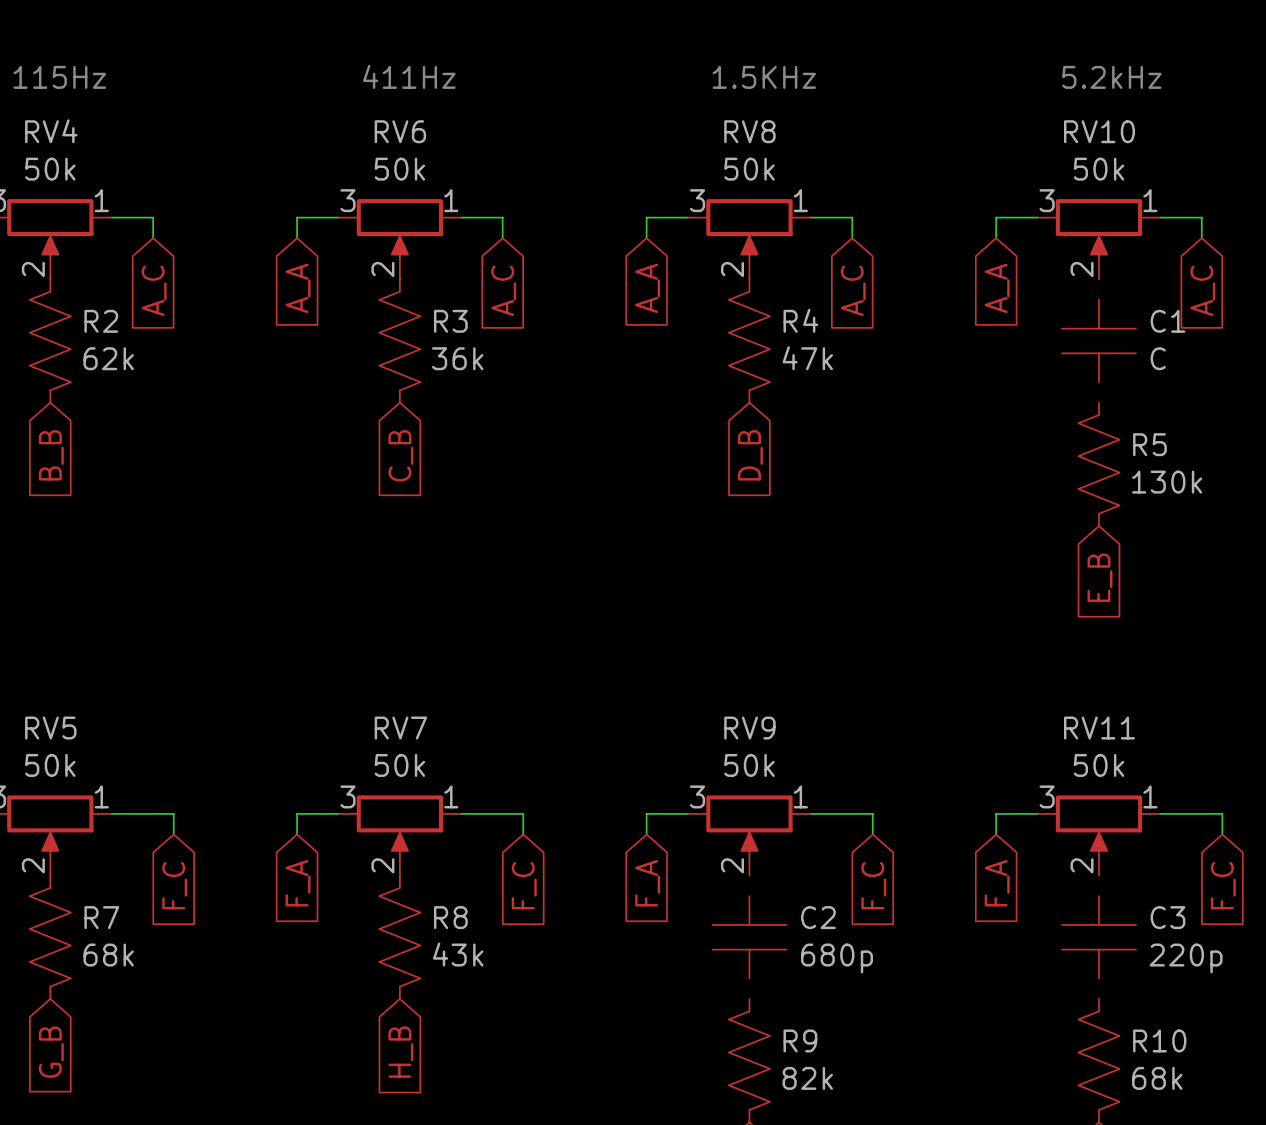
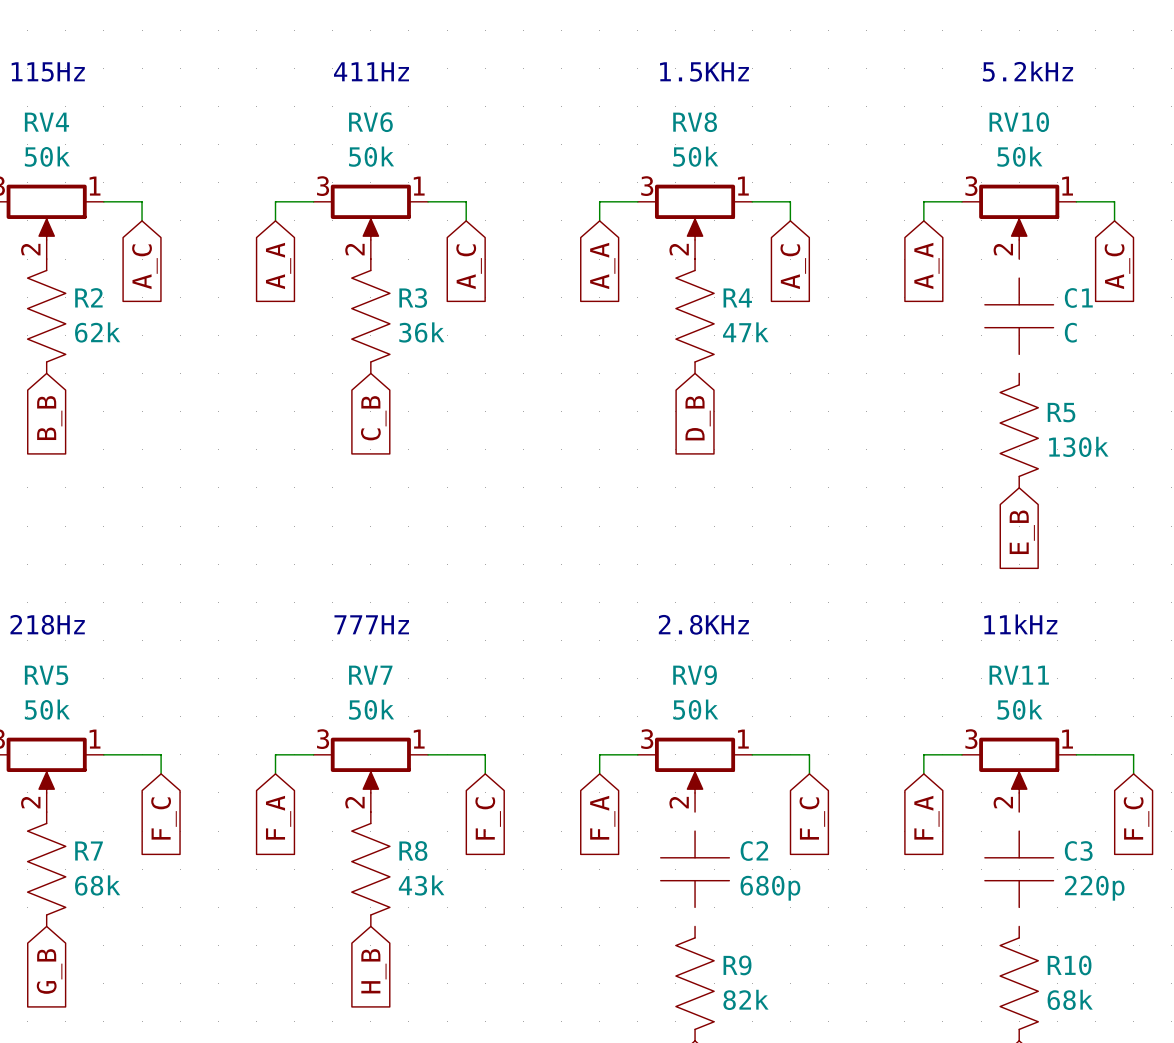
text: none -> 218Hz (47, 624)
text: none -> 777Hz (371, 624)
text: none -> 2.8KHz (703, 624)
text: none -> 11kHz (1020, 624)

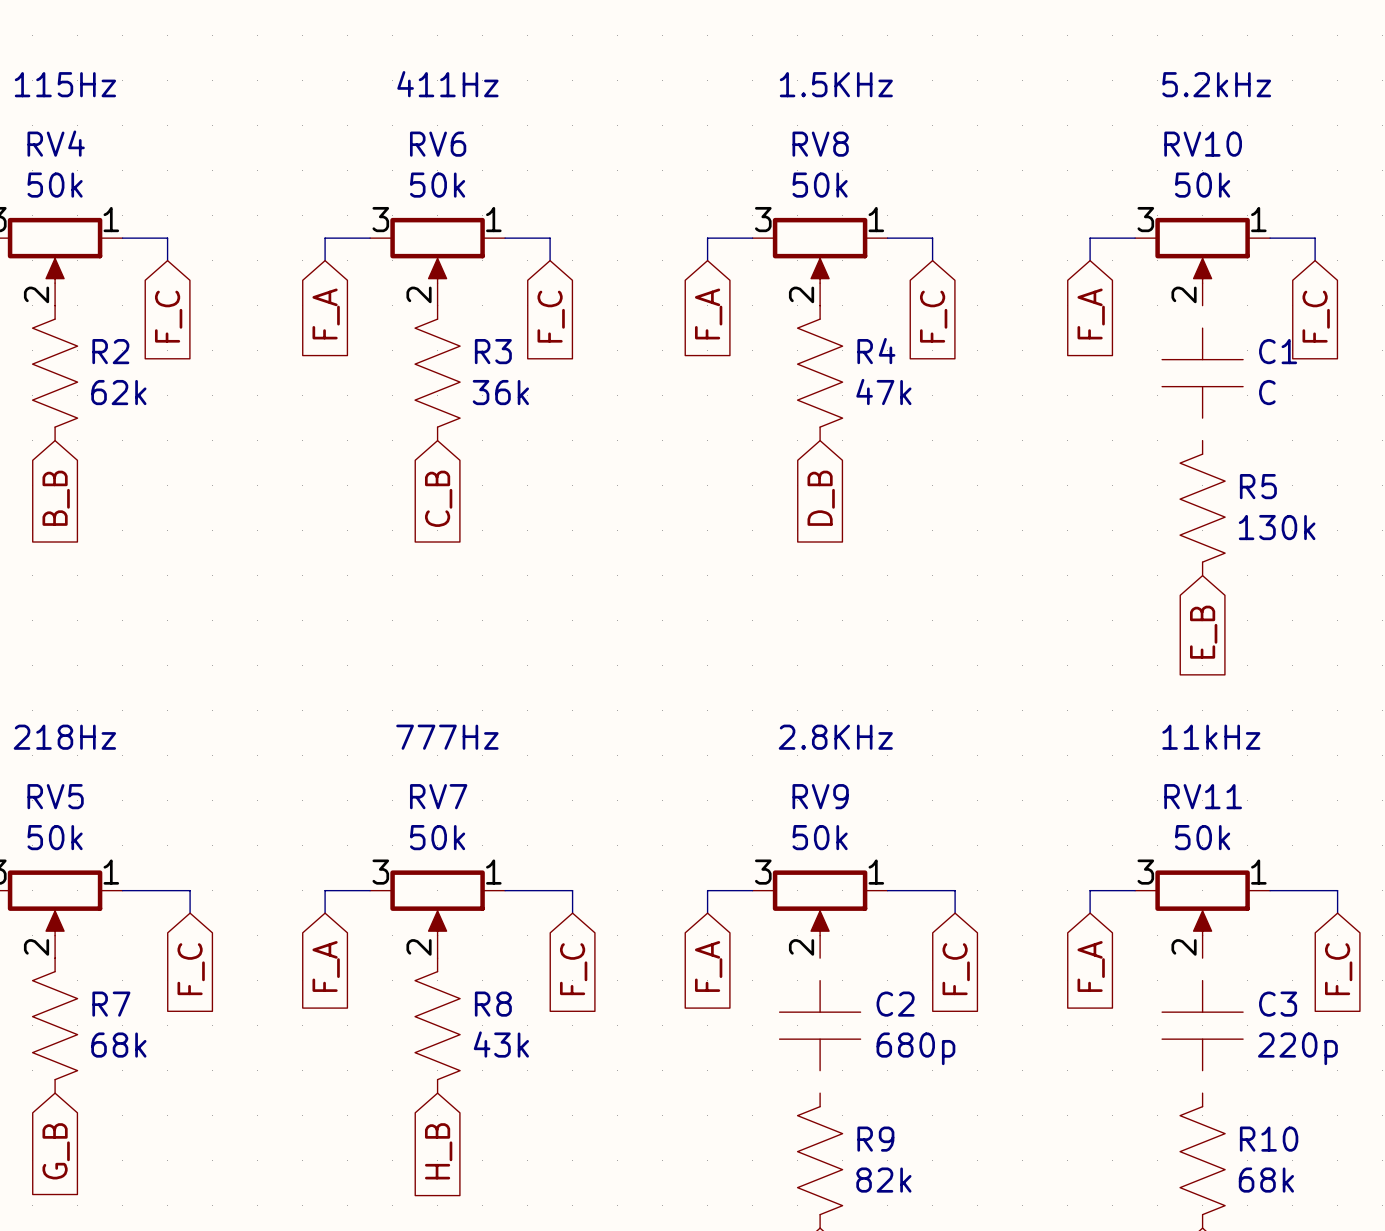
global label: A_A (278, 265) -> F_A (326, 313)
global label: A_A (602, 265) -> F_A (708, 313)
global label: A_A (926, 265) -> F_A (1091, 313)
global label: A_C (144, 266) -> F_C (168, 316)
global label: A_C (469, 266) -> F_C (551, 316)
global label: A_C (793, 266) -> F_C (933, 316)
global label: A_C (1117, 266) -> F_C (1316, 316)

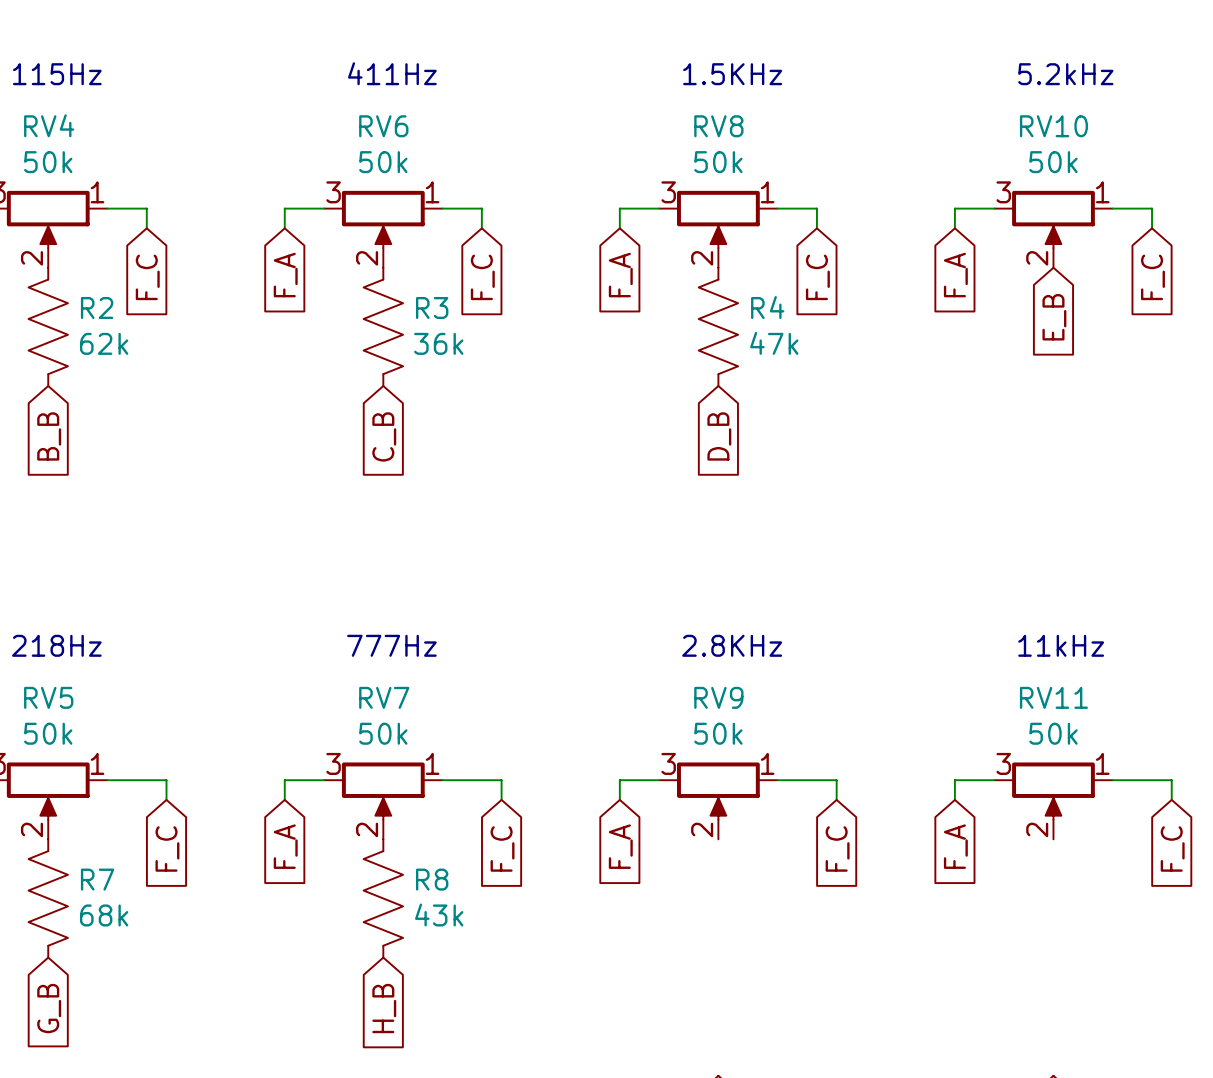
C1: C (1202, 373) -> none
R5: 130k (1202, 508) -> none
global label position: E_B (1203, 632) -> E_B (1054, 317)
C2: 680p (820, 1025) -> none
C3: 220p (1202, 1025) -> none
R9: 82k (820, 1160) -> none
R10: 68k (1202, 1160) -> none

